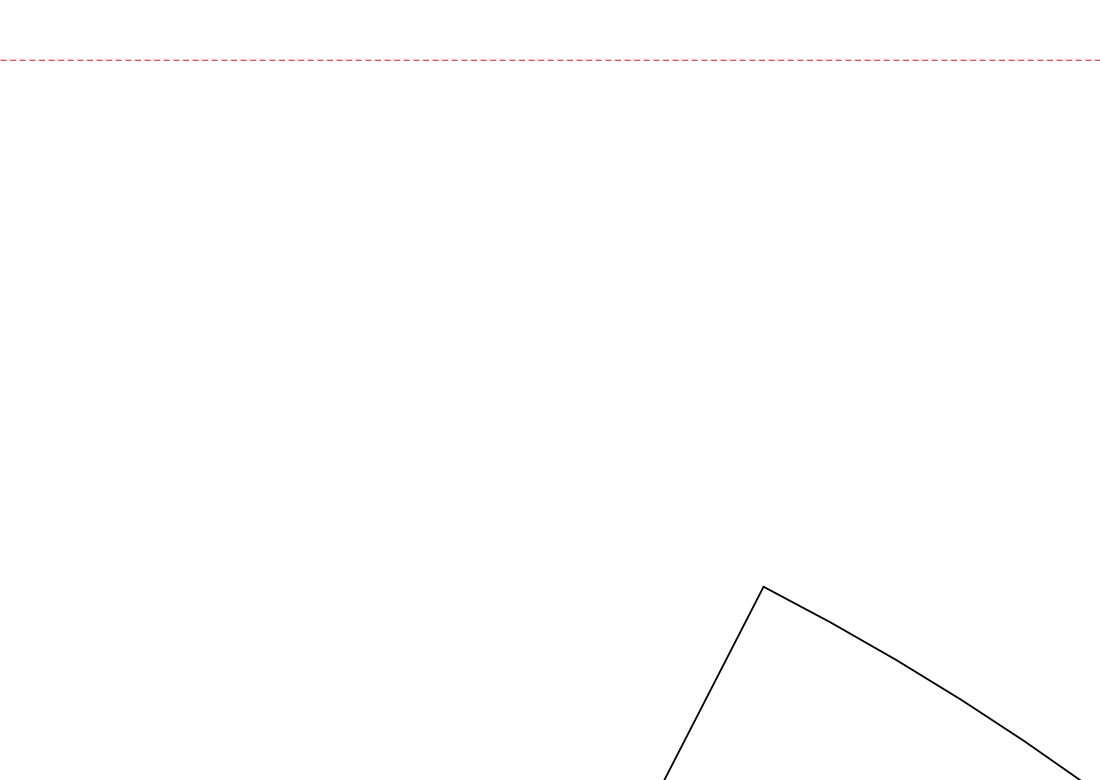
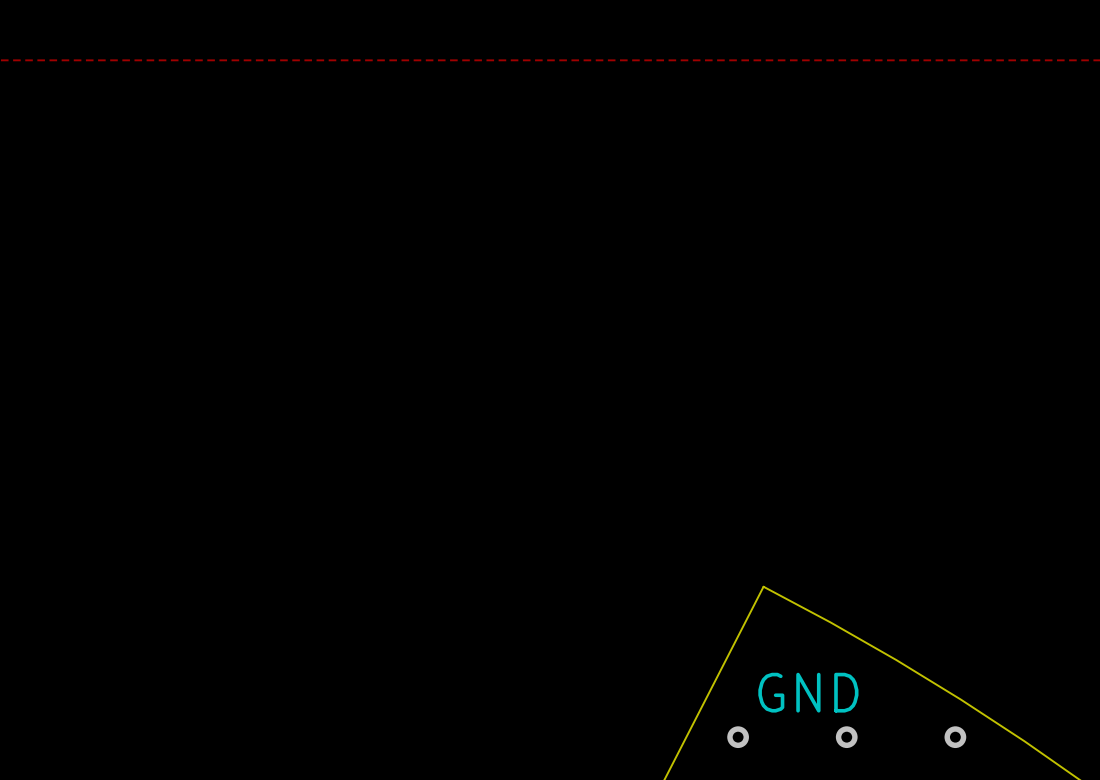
text: none -> GND (808, 692)
via: none -> (738, 737)
via: none -> (846, 737)
via: none -> (955, 737)

